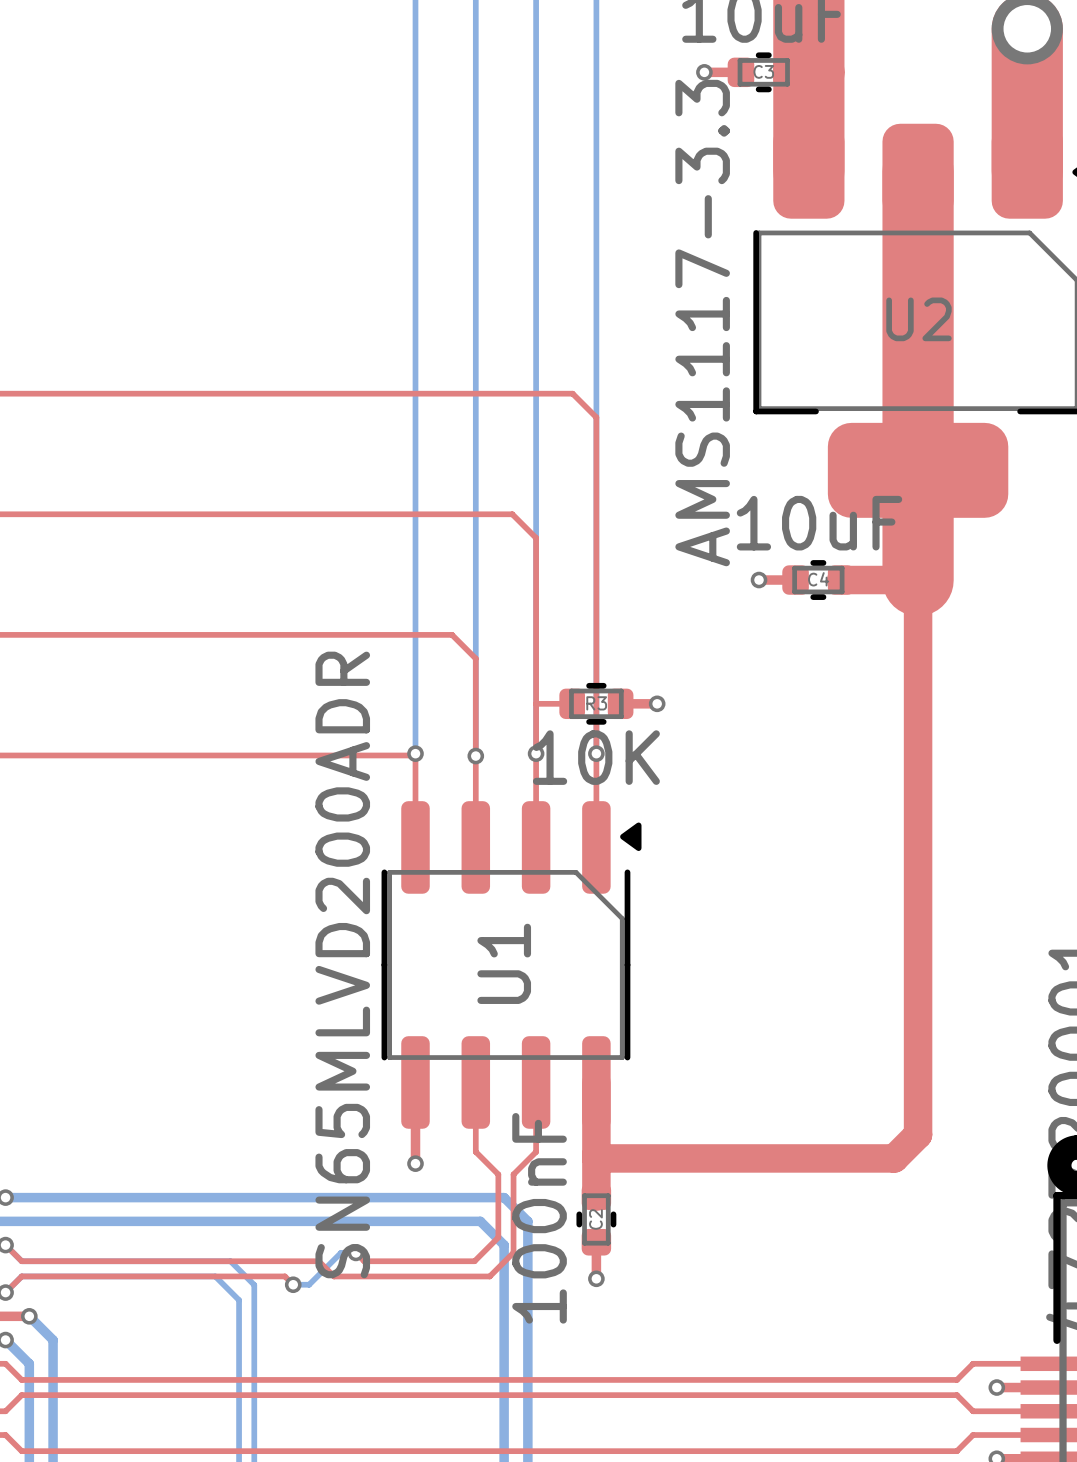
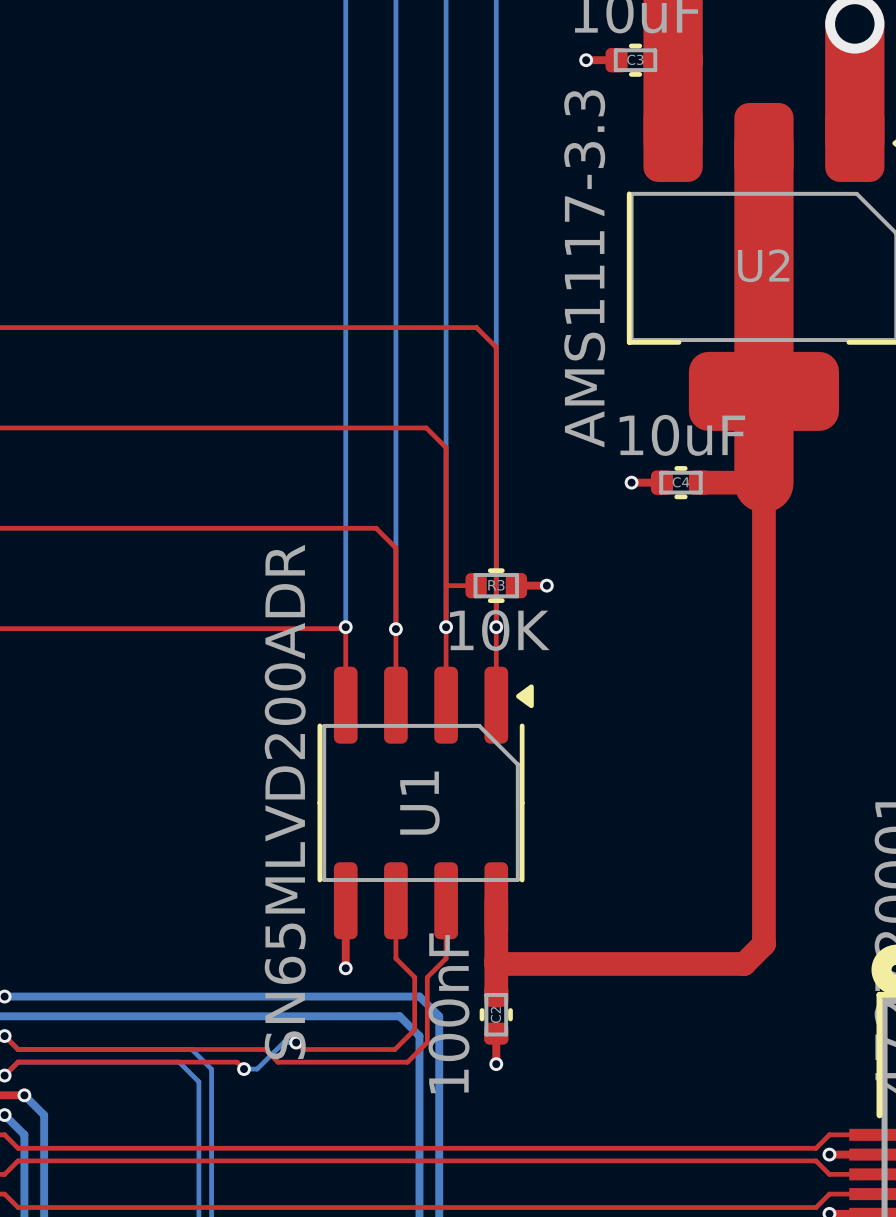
top track: (996, 1363) (973, 1363) (956, 1379) -> (829, 1134) (816, 1148) (796, 1148)
top track: (956, 1395) (973, 1411) (996, 1411) -> (796, 1160) (816, 1160) (829, 1174)
top track: (996, 1435) (973, 1435) (956, 1451) -> (829, 1194) (816, 1207) (796, 1207)

